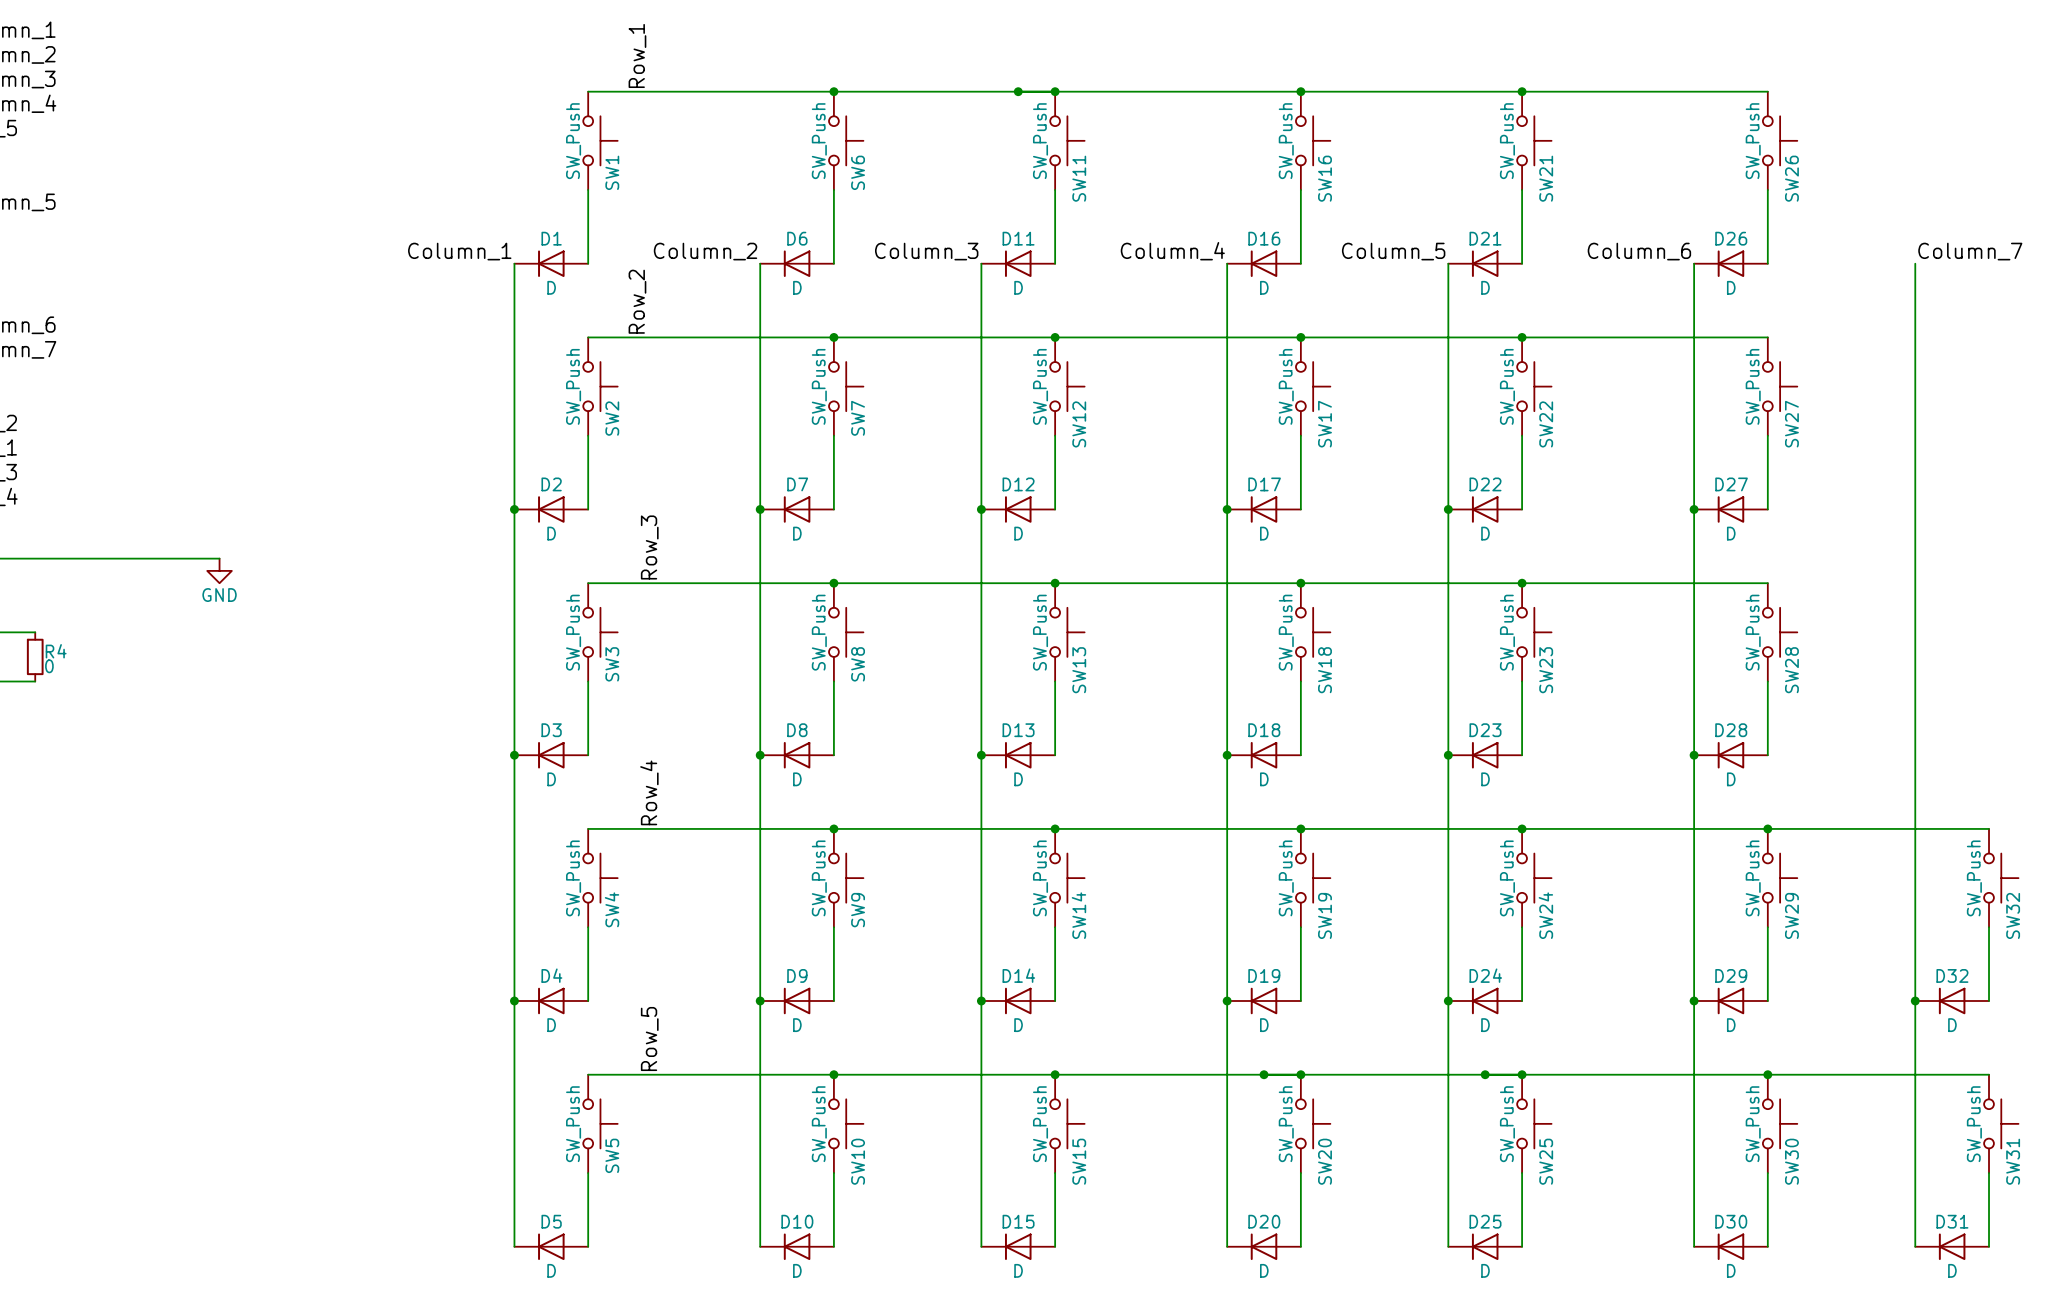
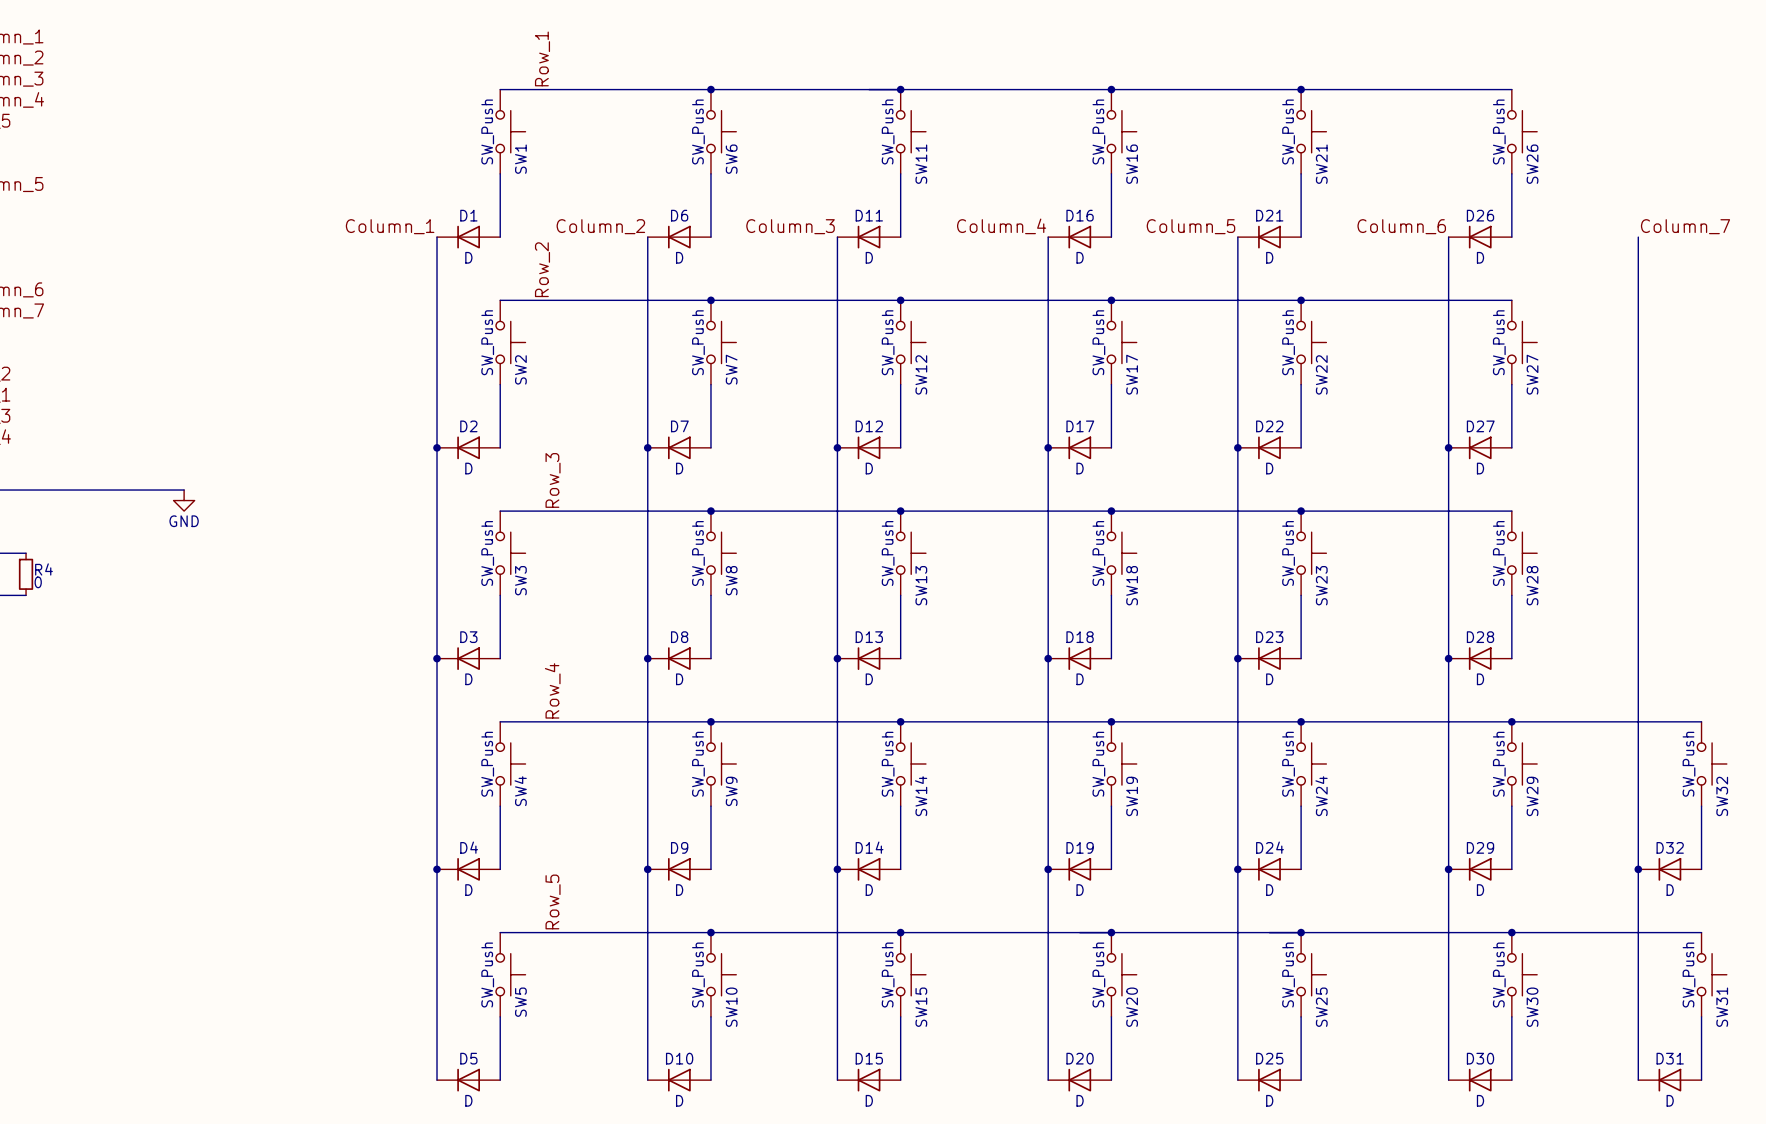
junction: (1018, 91) -> none
junction: (1264, 1074) -> none
junction: (1485, 1074) -> none

